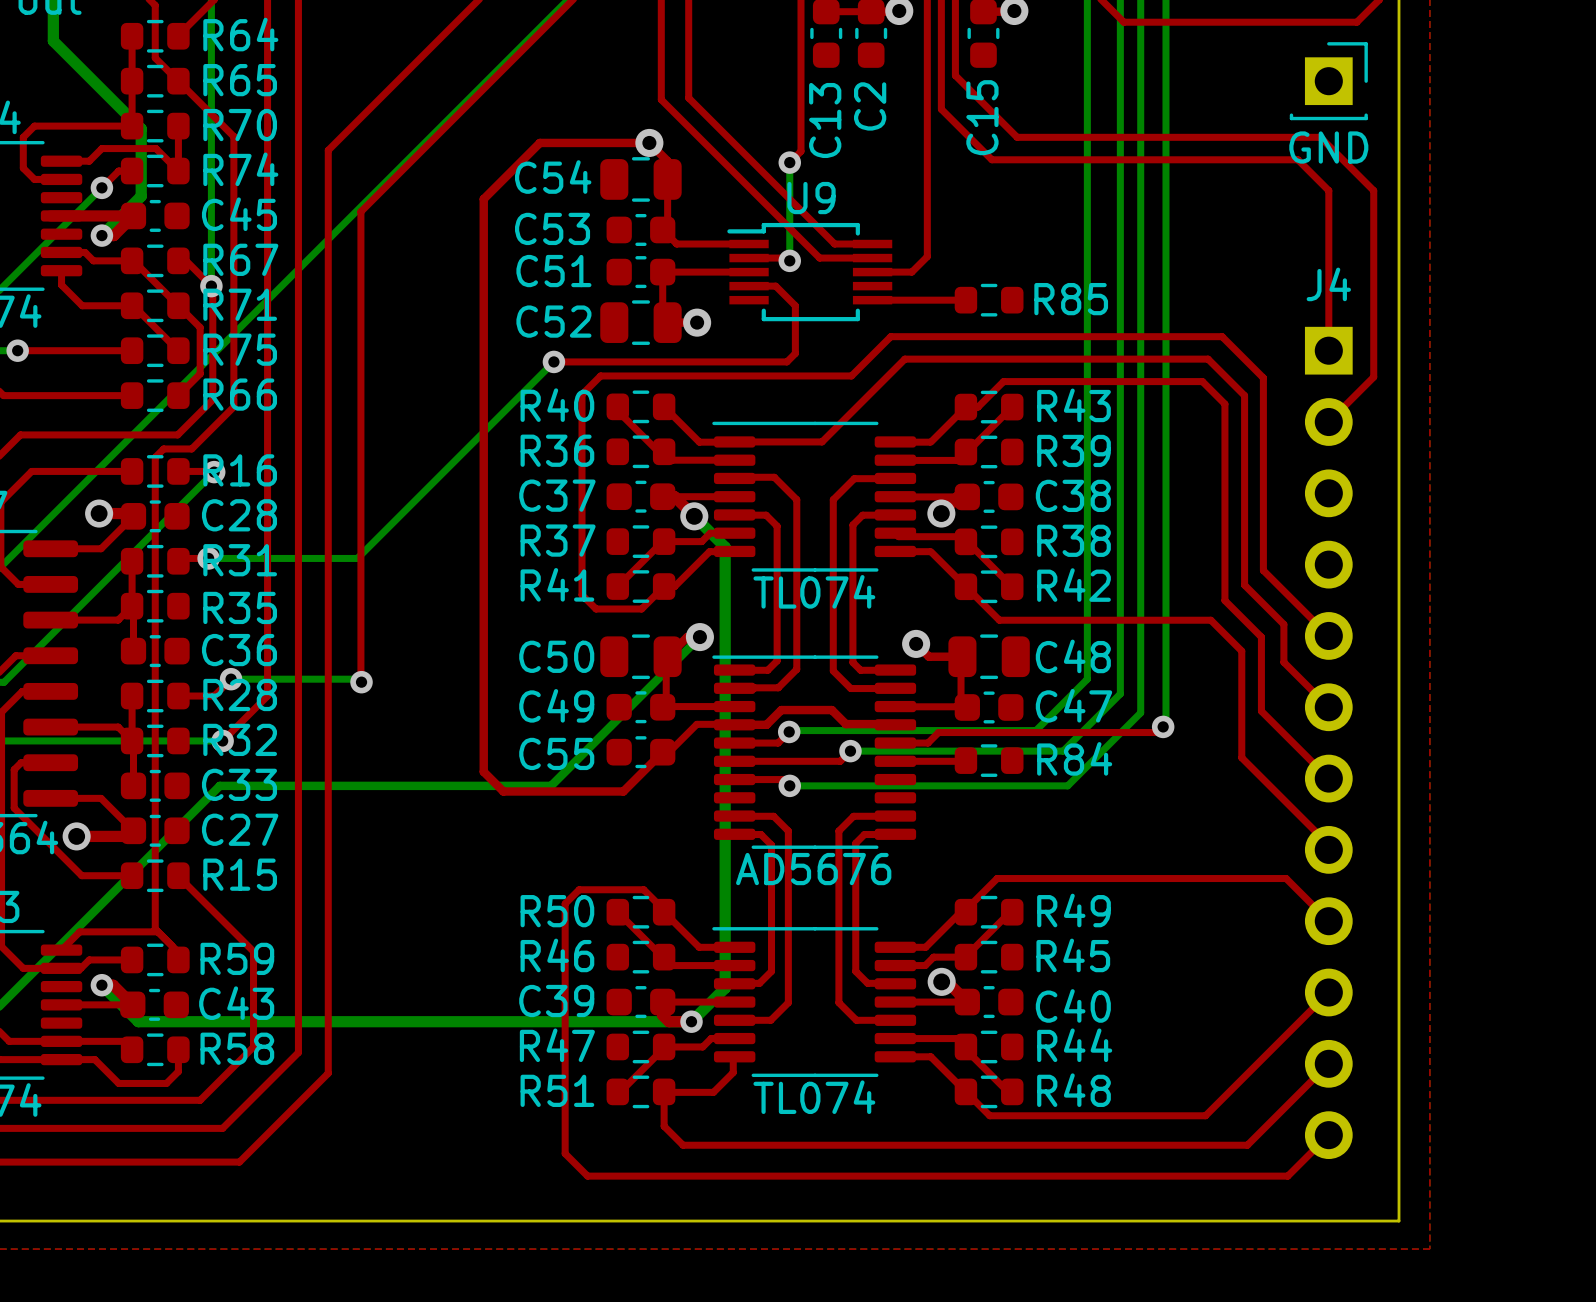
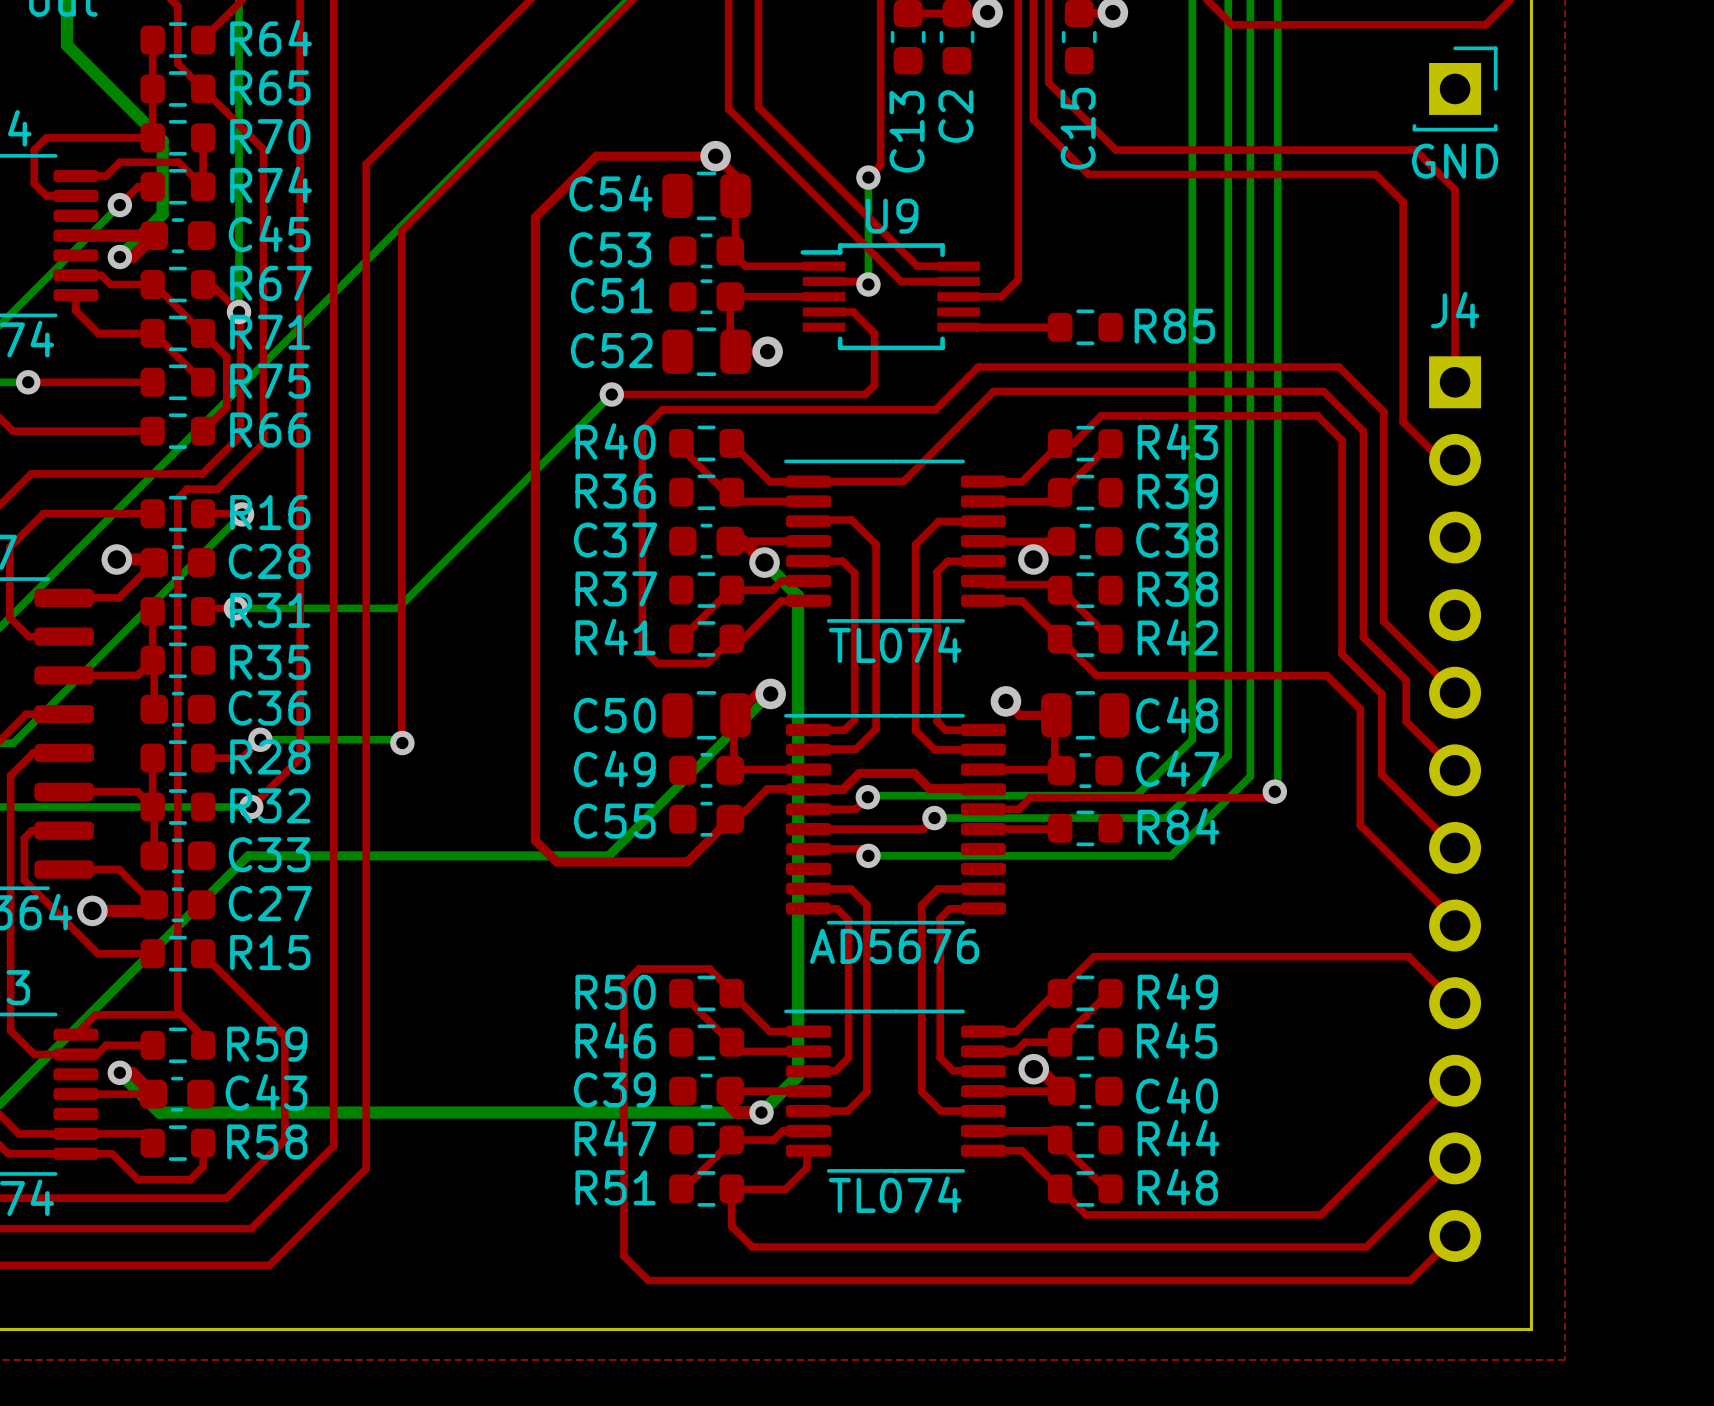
top track: (1292, 137) (1320, 137) (1373, 190) (1373, 377) (1328, 422) -> none
top track: (1255, 159) (1297, 159) (1328, 190) -> (1415, 150) (1455, 189) (1455, 208)
top track: none -> (1375, 174) (1403, 202) (1403, 422) (1441, 459)

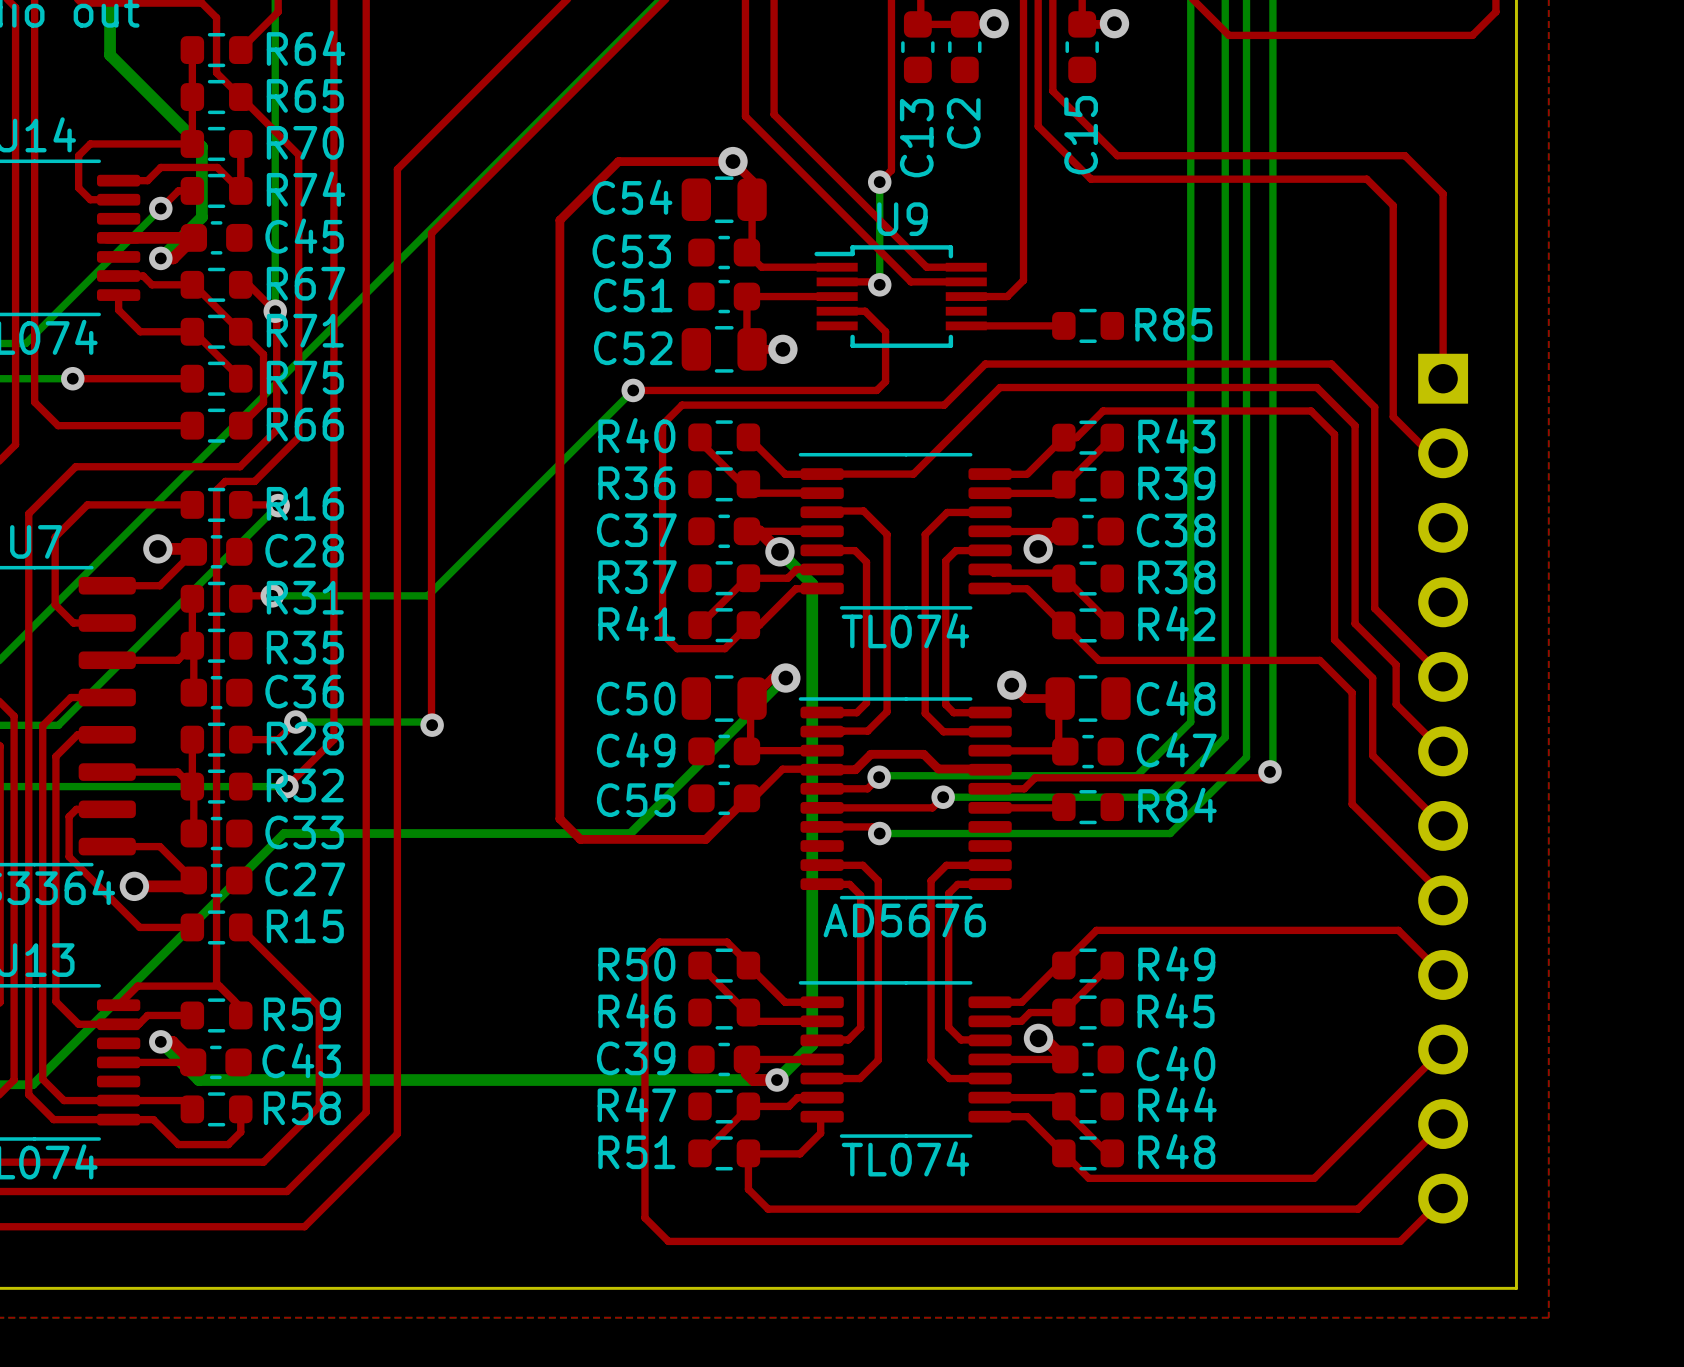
part: (1455, 88) -> none
text: GND (1455, 161) -> none
text: J4 (1455, 310) -> none

